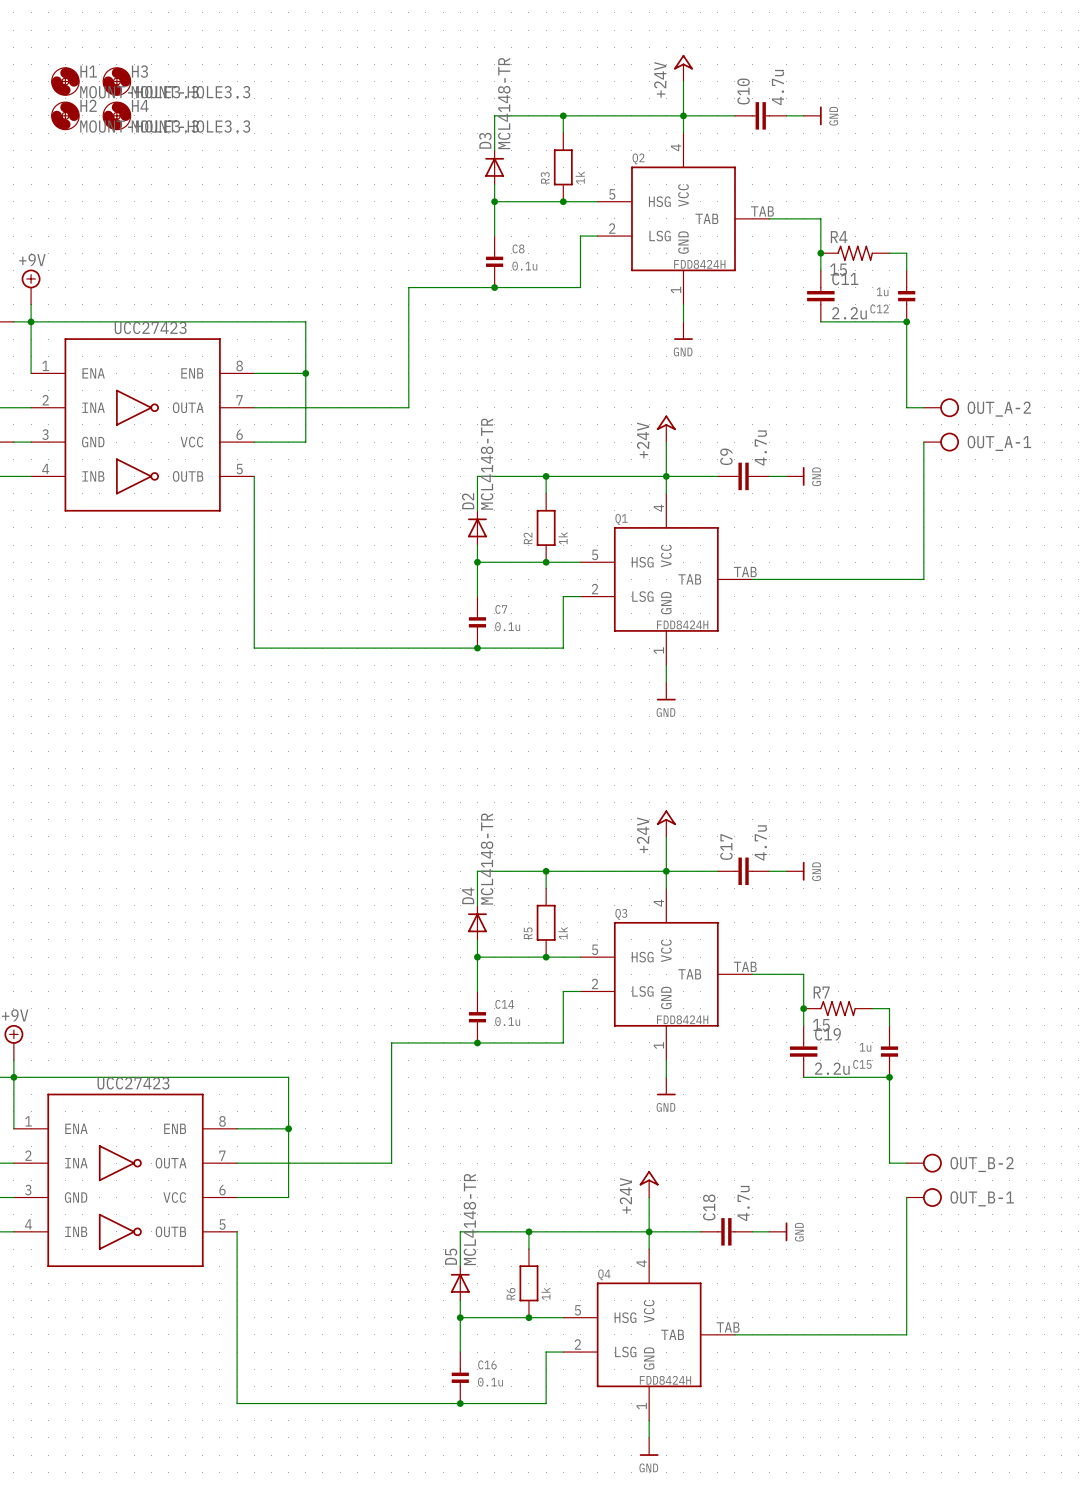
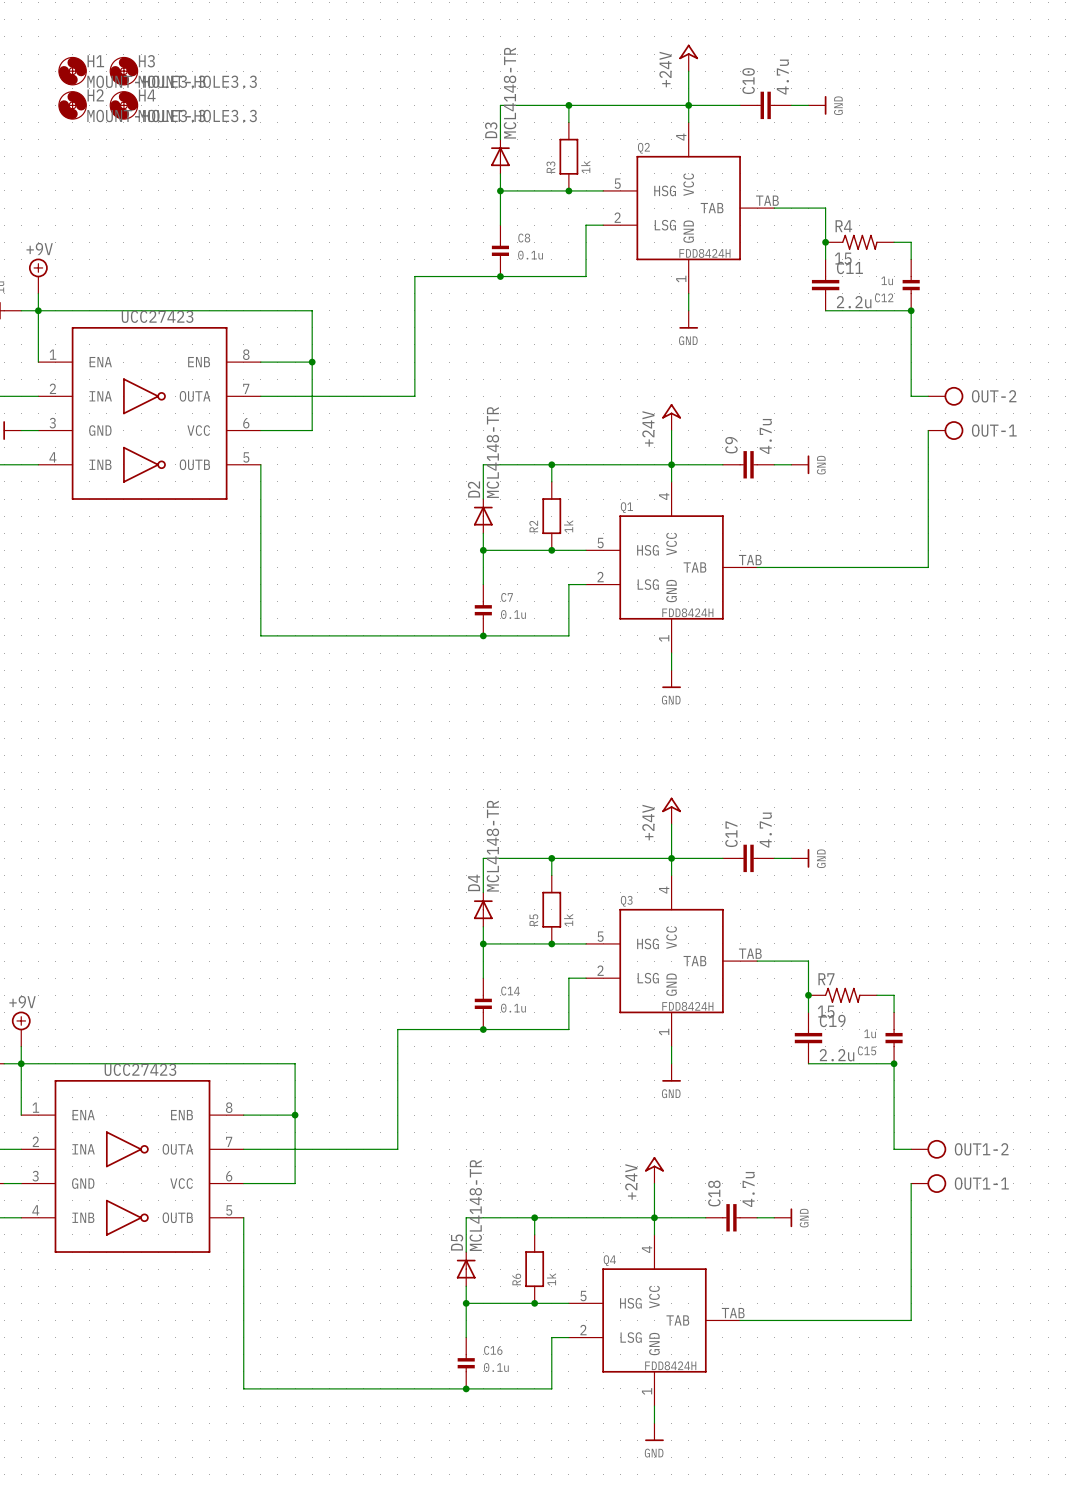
OUT_A-2 name: OUT_A-2 (999, 409) -> OUT-2 (994, 396)
OUT_A-1 name: OUT_A-1 (999, 443) -> OUT-1 (994, 430)
OUT_B-2 name: OUT_B-2 (982, 1164) -> OUT1-2 (981, 1149)
OUT_B-1 name: OUT_B-1 (982, 1198) -> OUT1-1 (981, 1183)

